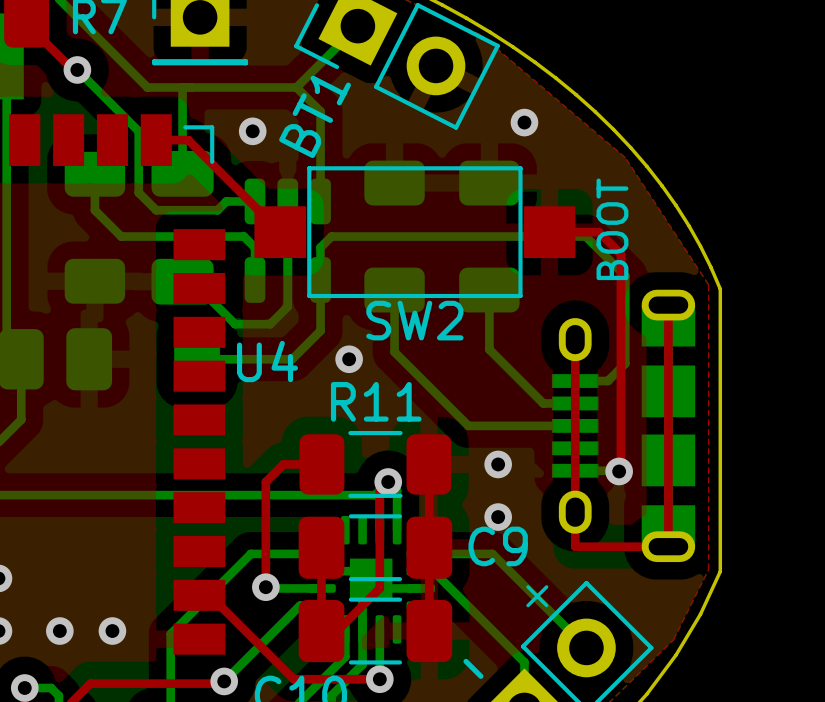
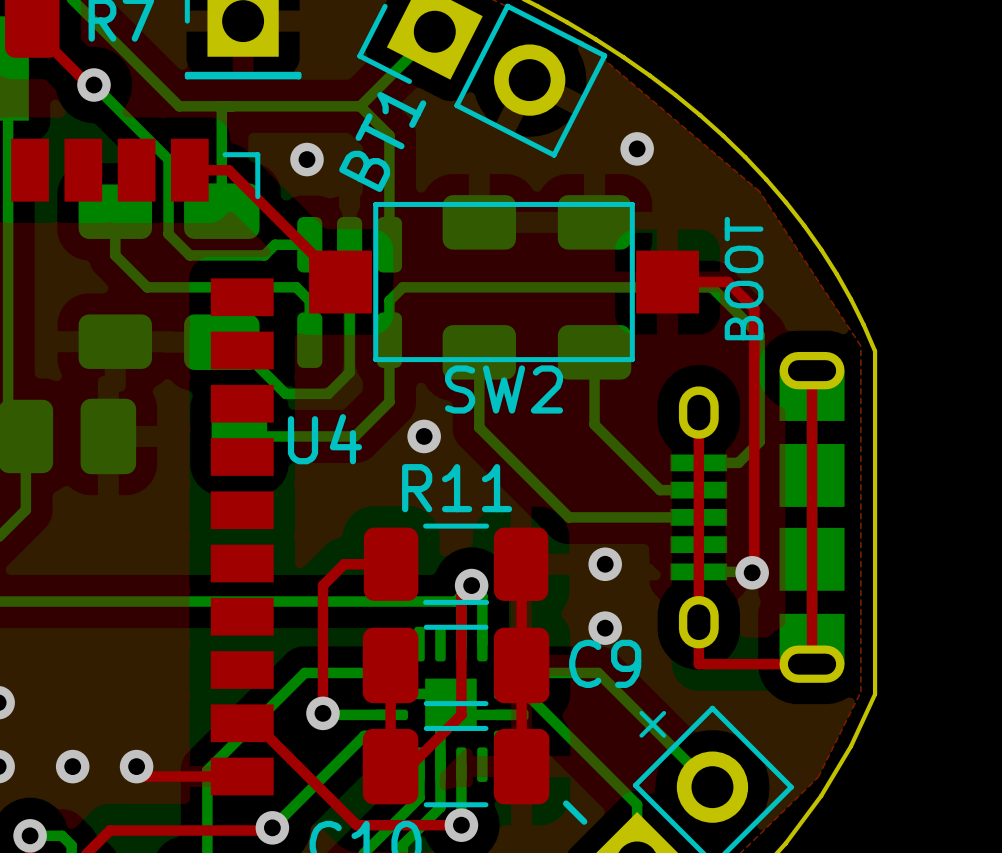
top track: none -> (136, 766) (146, 776) (242, 776)

